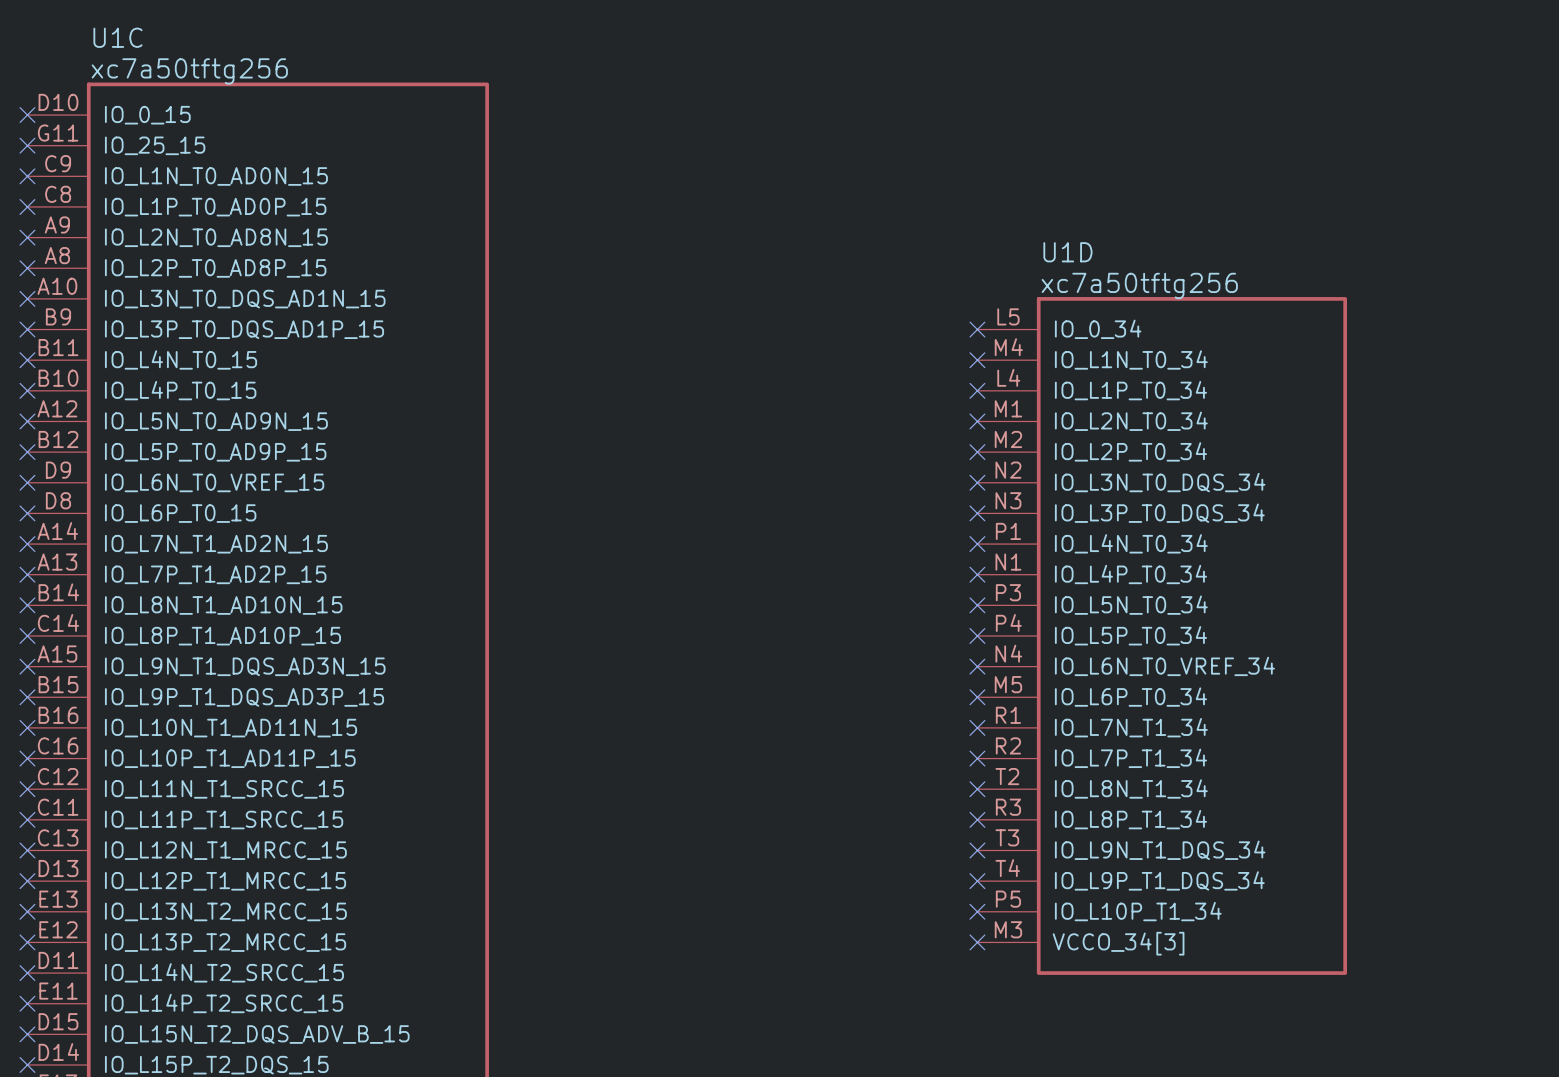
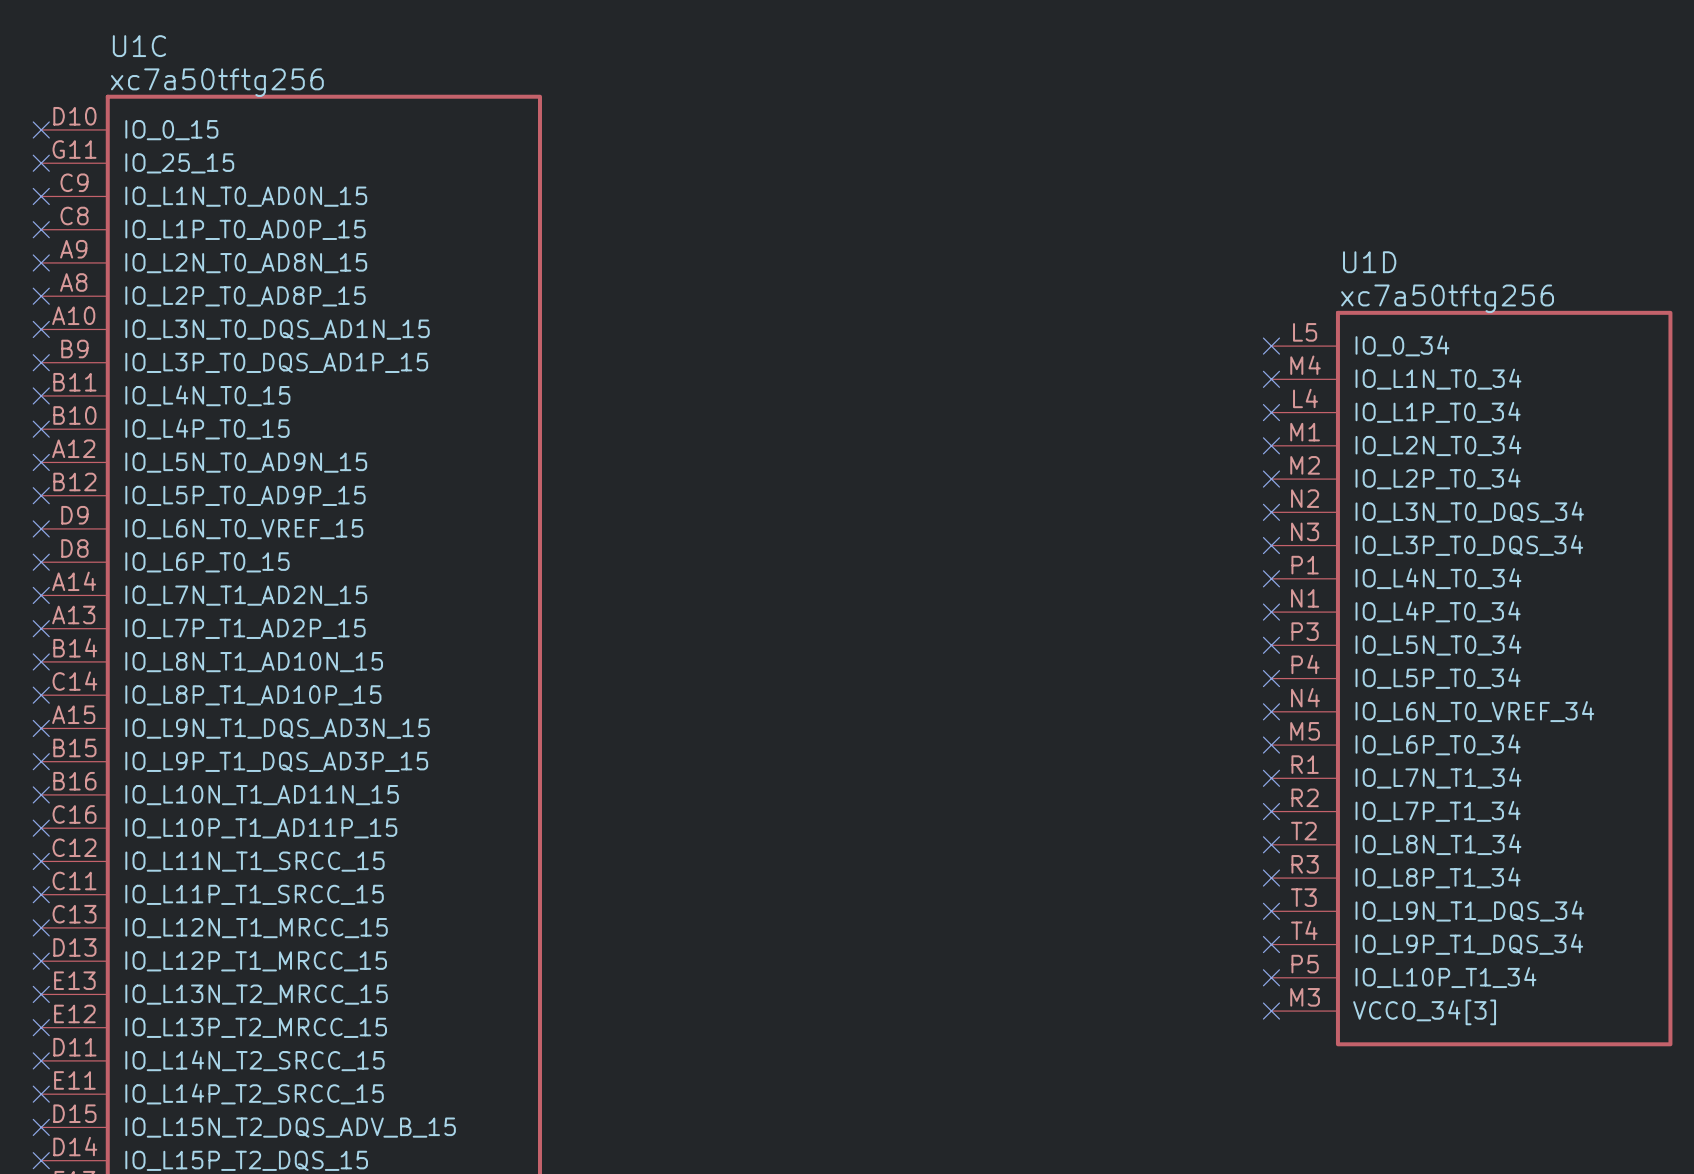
no-connect mark: none -> (1271, 346)
no-connect mark: (977, 329) -> none
no-connect mark: none -> (1271, 379)
no-connect mark: (977, 360) -> none
no-connect mark: none -> (1271, 412)
no-connect mark: (977, 390) -> none
no-connect mark: none -> (1271, 445)
no-connect mark: (977, 421) -> none
no-connect mark: none -> (1271, 479)
no-connect mark: (977, 452) -> none
no-connect mark: none -> (1271, 512)
no-connect mark: (977, 482) -> none
no-connect mark: none -> (1271, 545)
no-connect mark: (977, 513) -> none
no-connect mark: none -> (1271, 578)
no-connect mark: (977, 544) -> none
no-connect mark: none -> (1271, 612)
no-connect mark: (977, 574) -> none
no-connect mark: none -> (1271, 645)
no-connect mark: (977, 605) -> none
no-connect mark: none -> (1271, 678)
no-connect mark: (977, 635) -> none
U1D position: (1162, 635) -> (1471, 678)
no-connect mark: none -> (1271, 711)
no-connect mark: (977, 666) -> none
no-connect mark: none -> (1271, 745)
no-connect mark: (977, 697) -> none
no-connect mark: none -> (1271, 778)
no-connect mark: (977, 727) -> none
no-connect mark: none -> (1271, 811)
no-connect mark: (977, 758) -> none
no-connect mark: none -> (1271, 844)
no-connect mark: (977, 789) -> none
no-connect mark: none -> (1271, 878)
no-connect mark: (977, 819) -> none
no-connect mark: none -> (1271, 911)
no-connect mark: (977, 850) -> none
no-connect mark: none -> (1271, 944)
no-connect mark: (977, 881) -> none
no-connect mark: none -> (1271, 977)
no-connect mark: (977, 911) -> none
no-connect mark: none -> (1271, 1011)
no-connect mark: (977, 942) -> none

